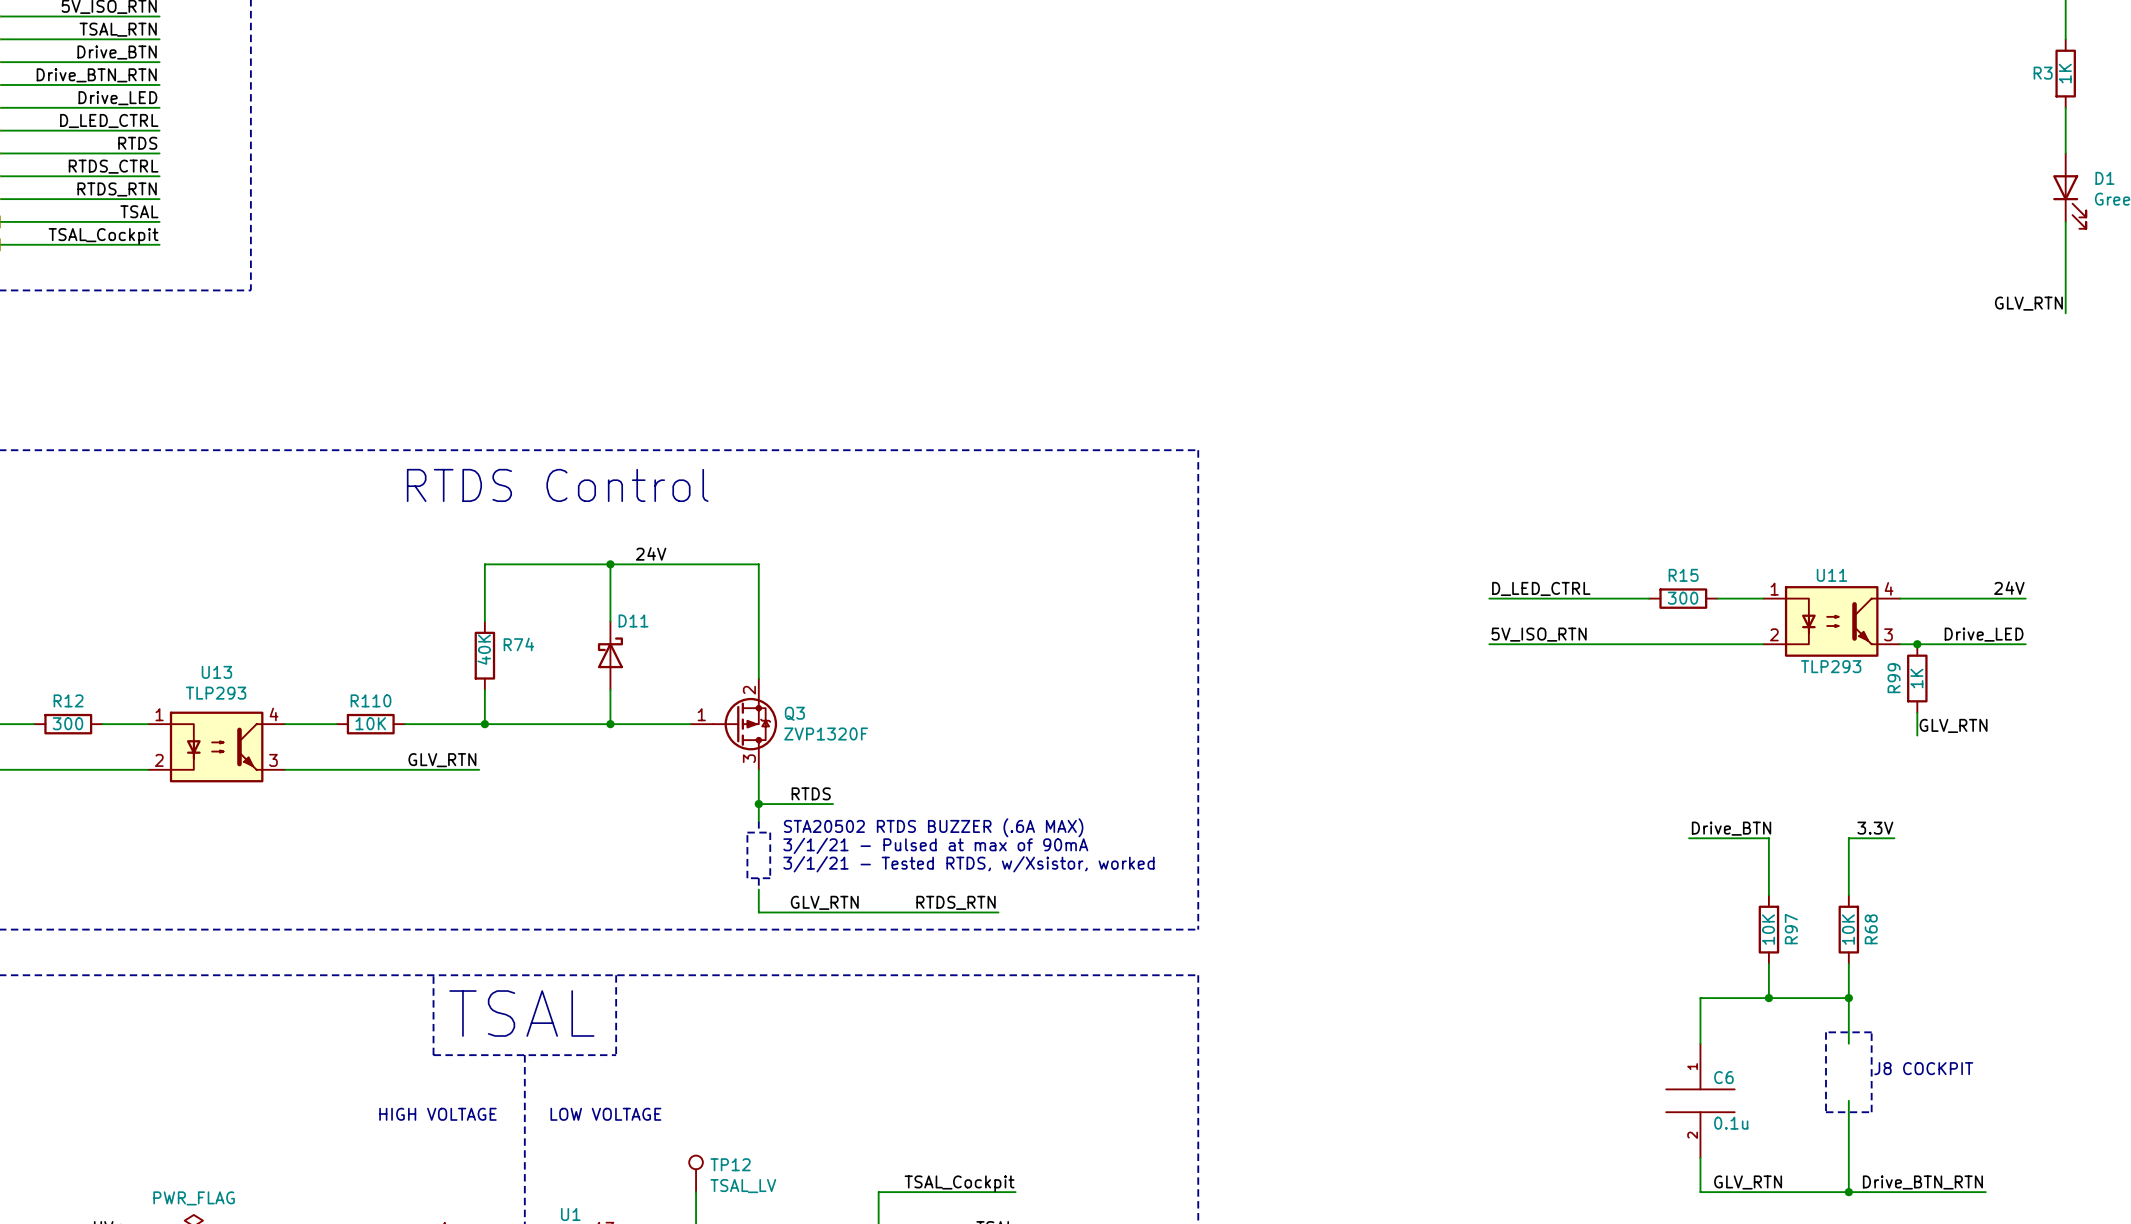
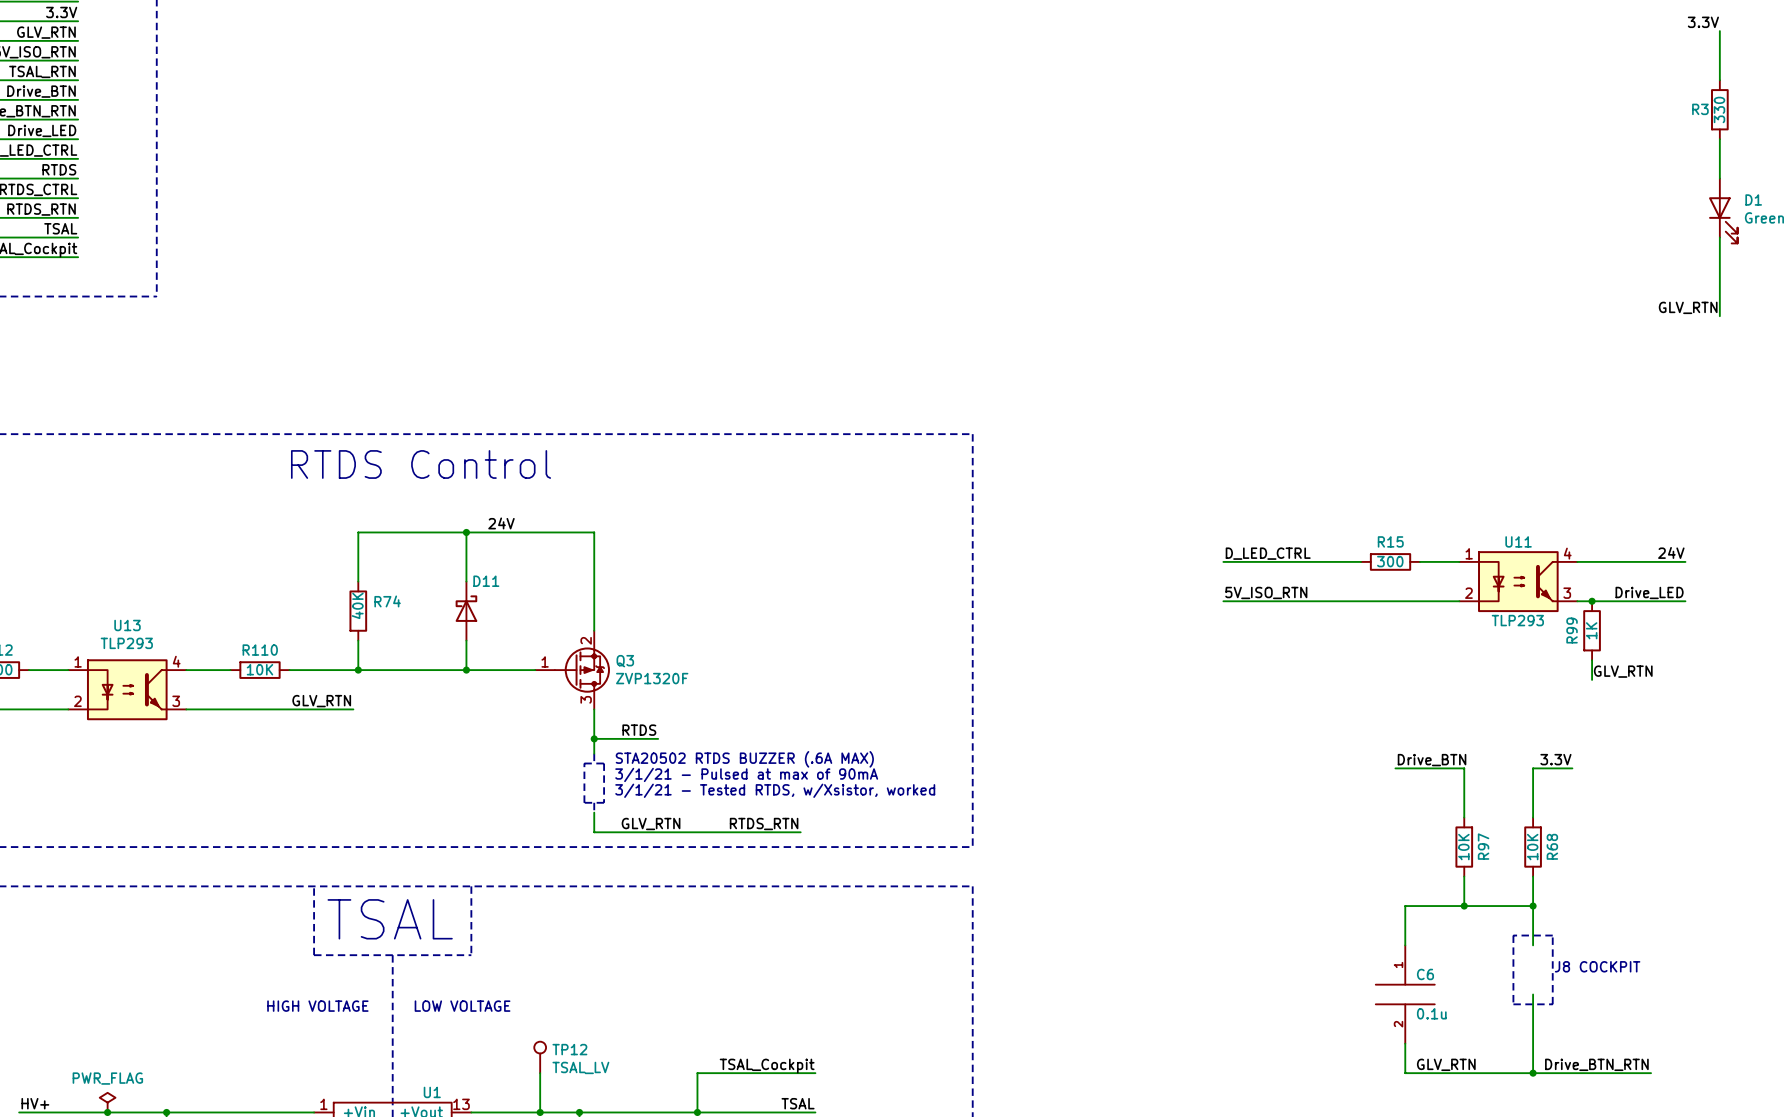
R3 value: 1K (2065, 73) -> 330 (1719, 109)

